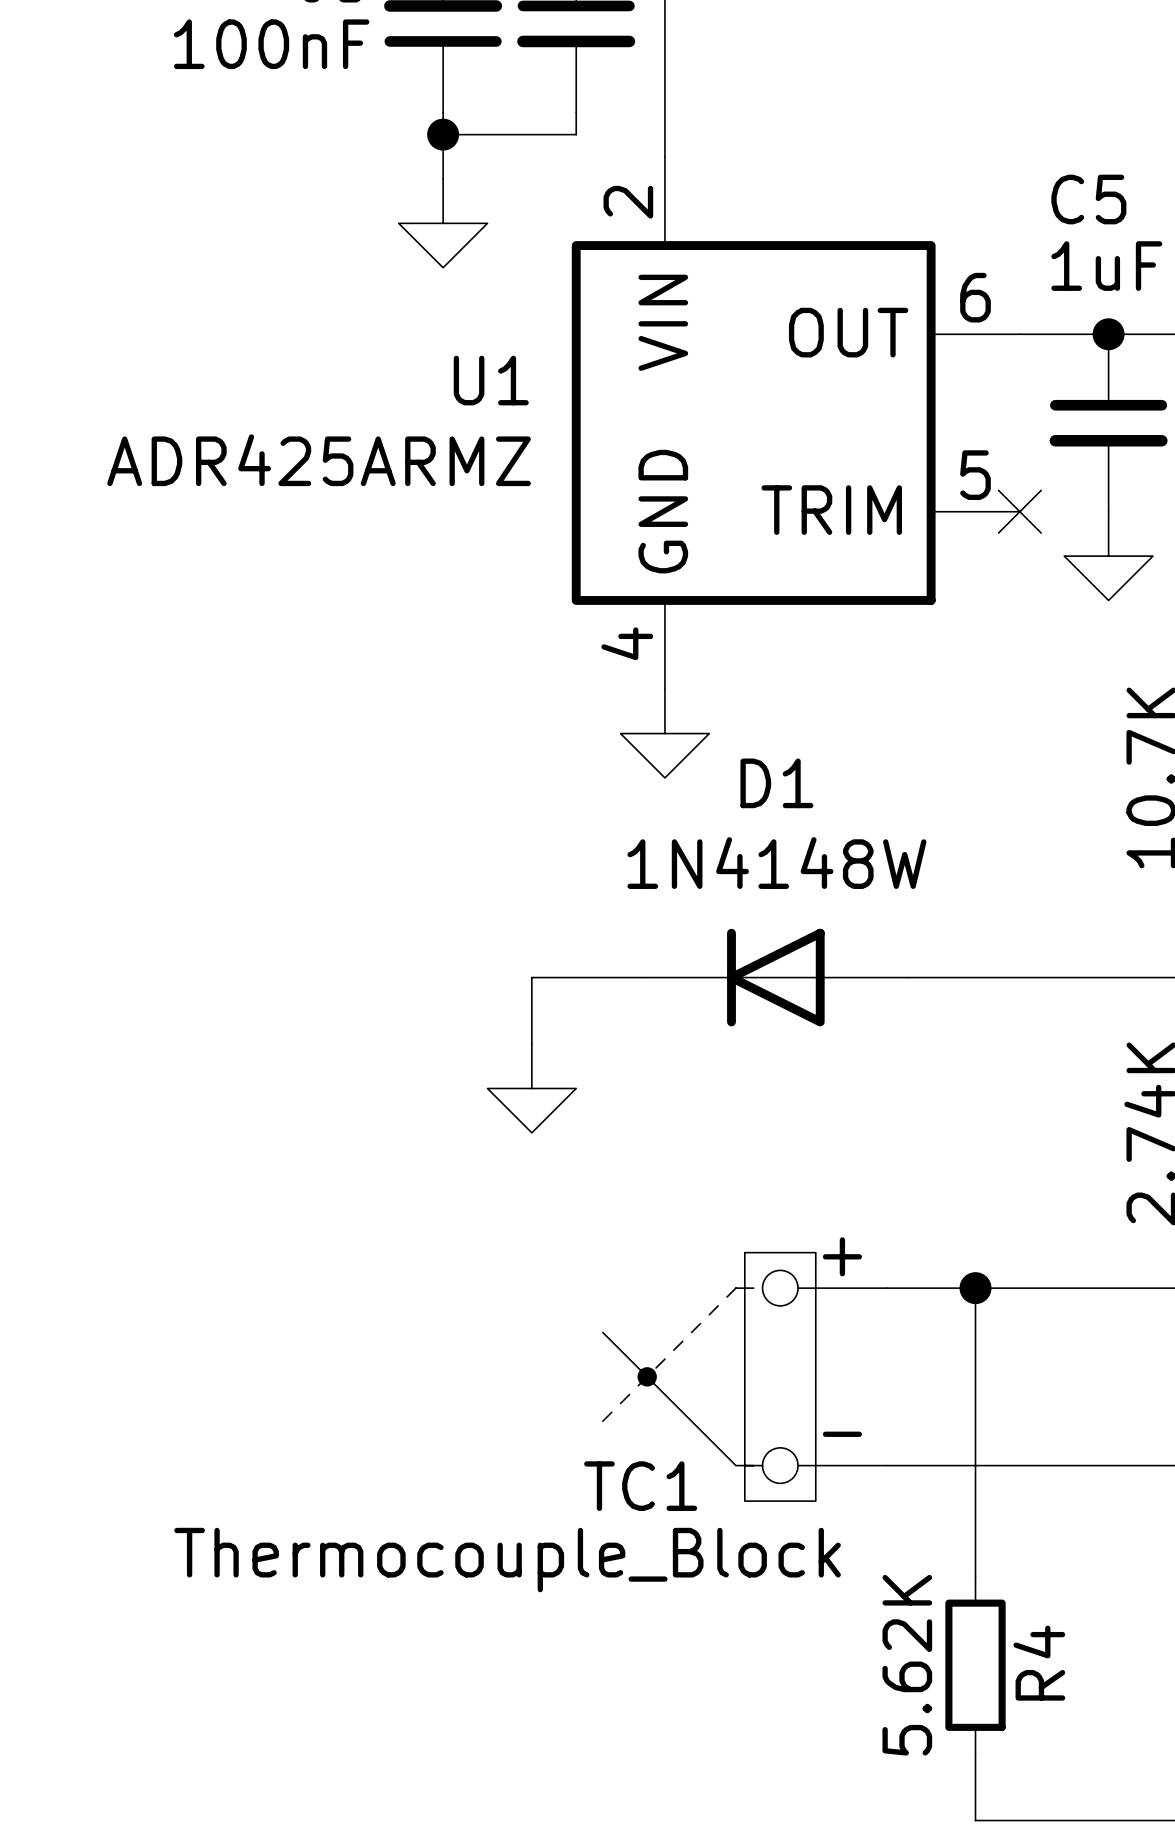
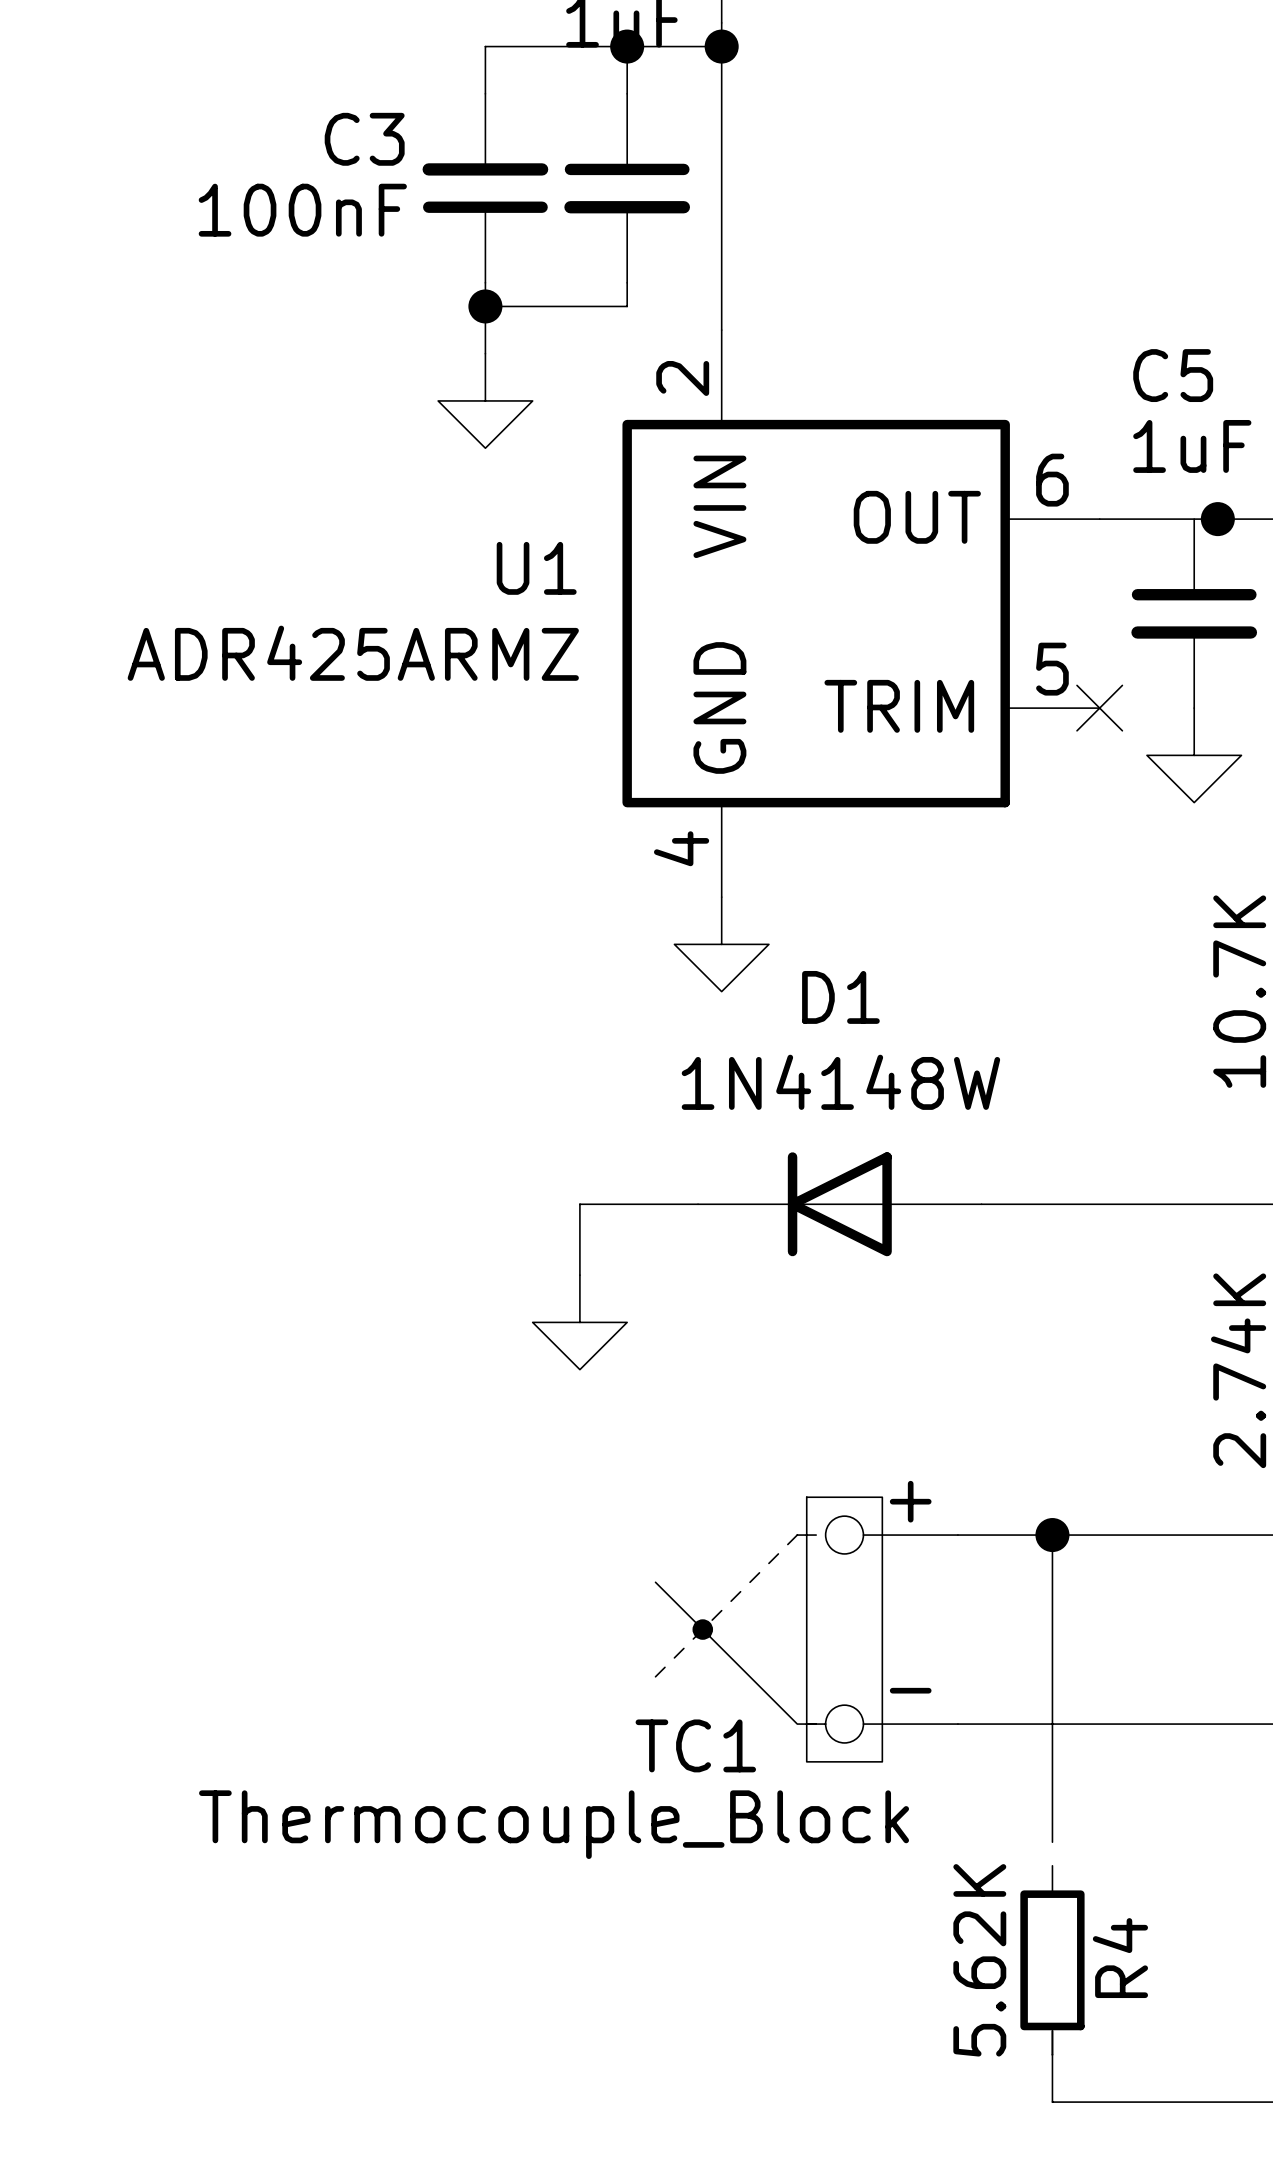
junction position: (1108, 334) -> (1217, 519)
R4 position: (975, 1665) -> (1052, 1960)

